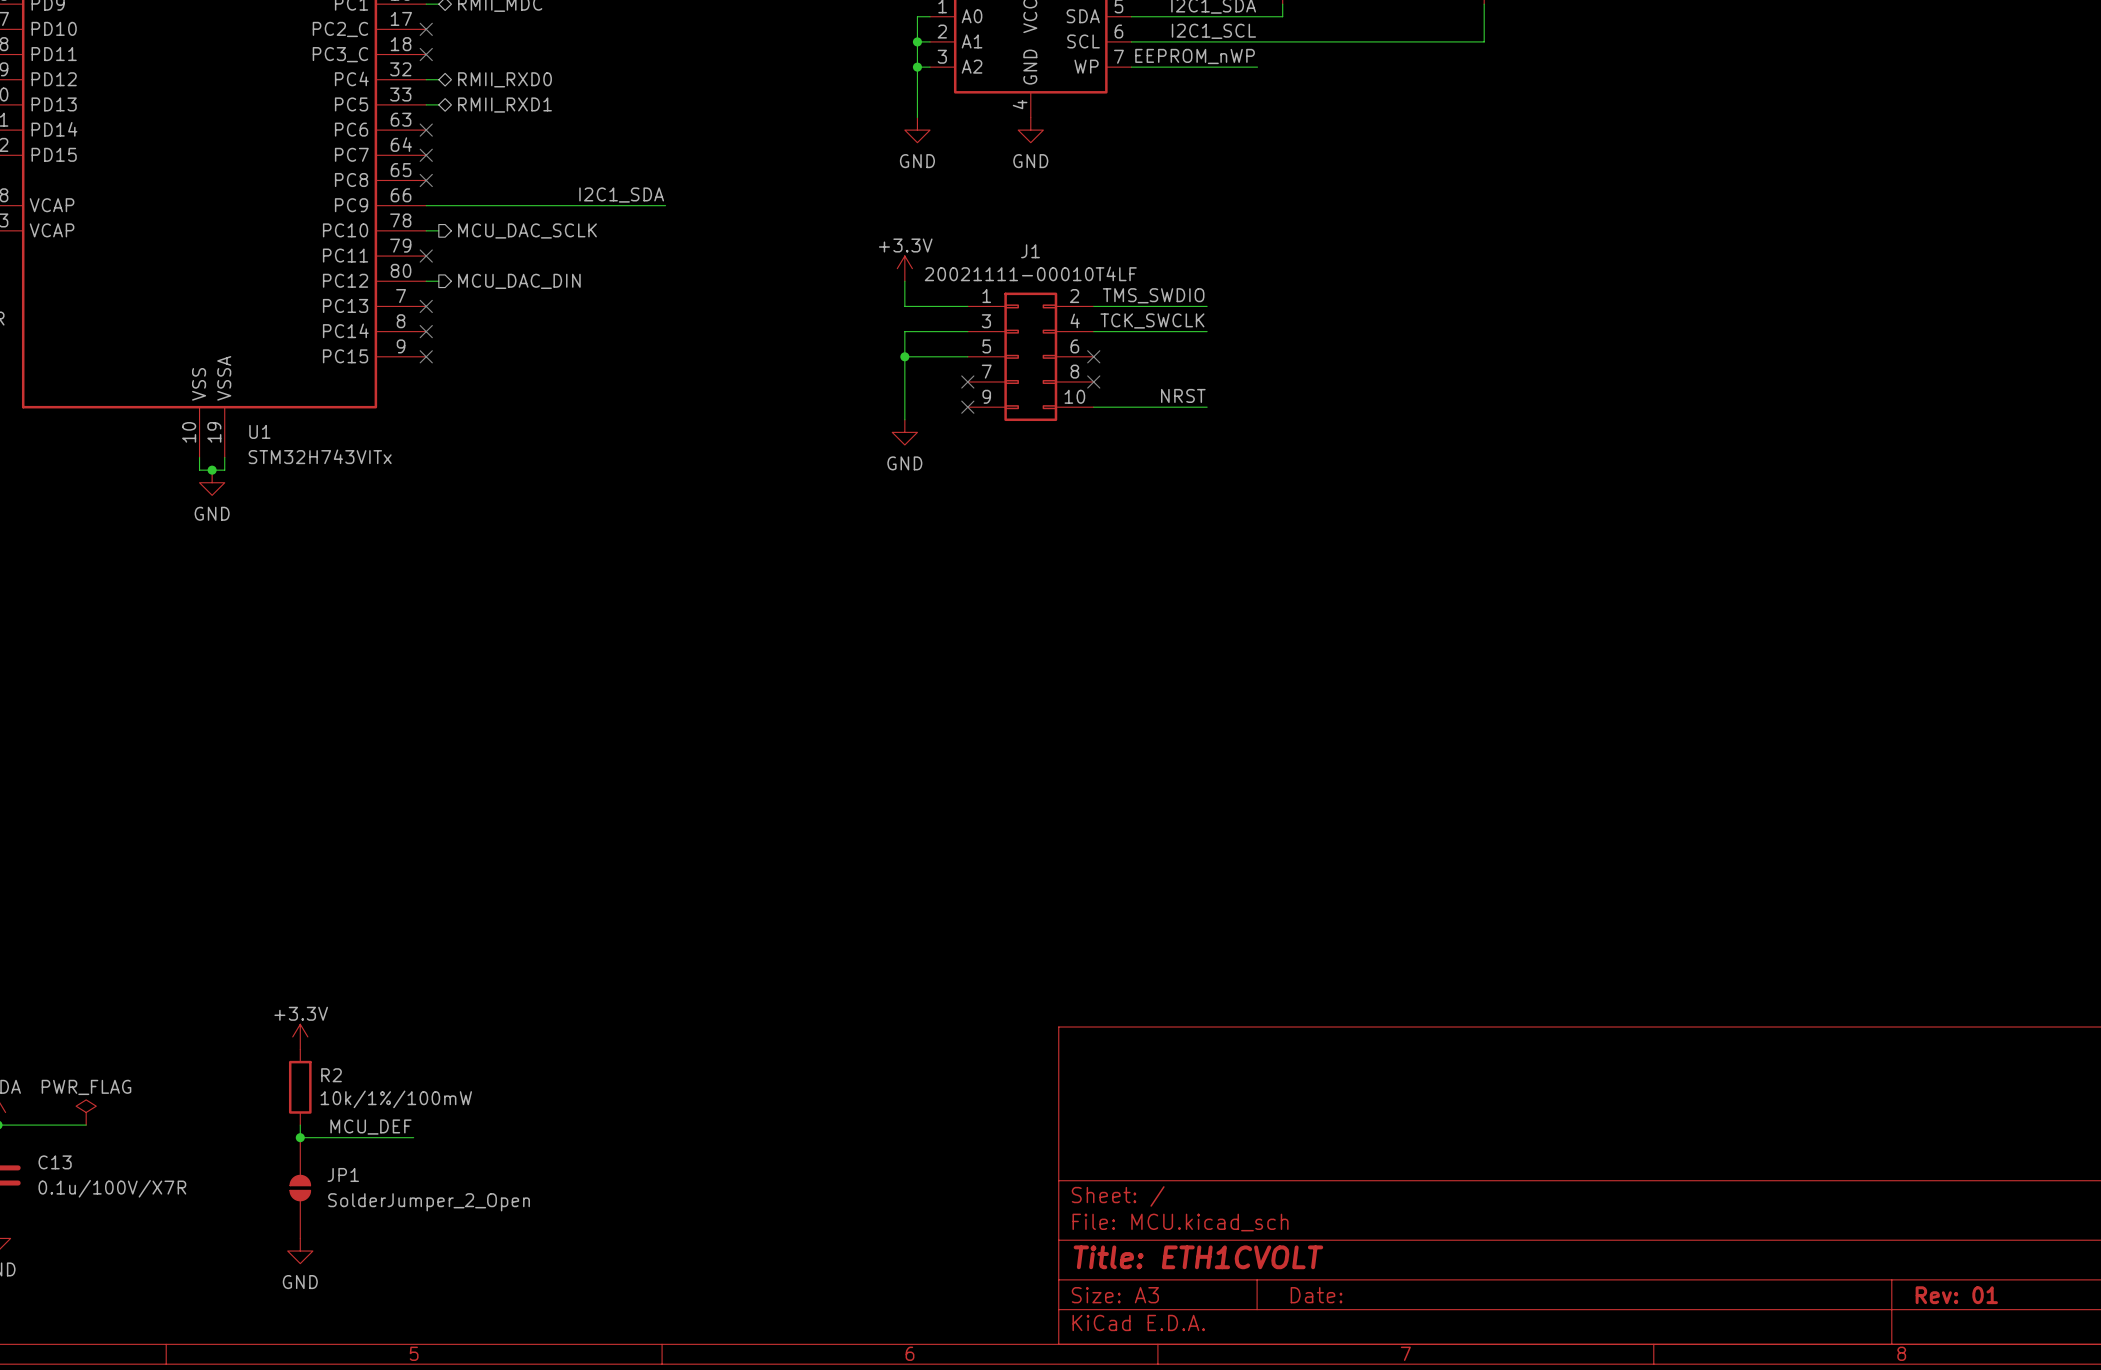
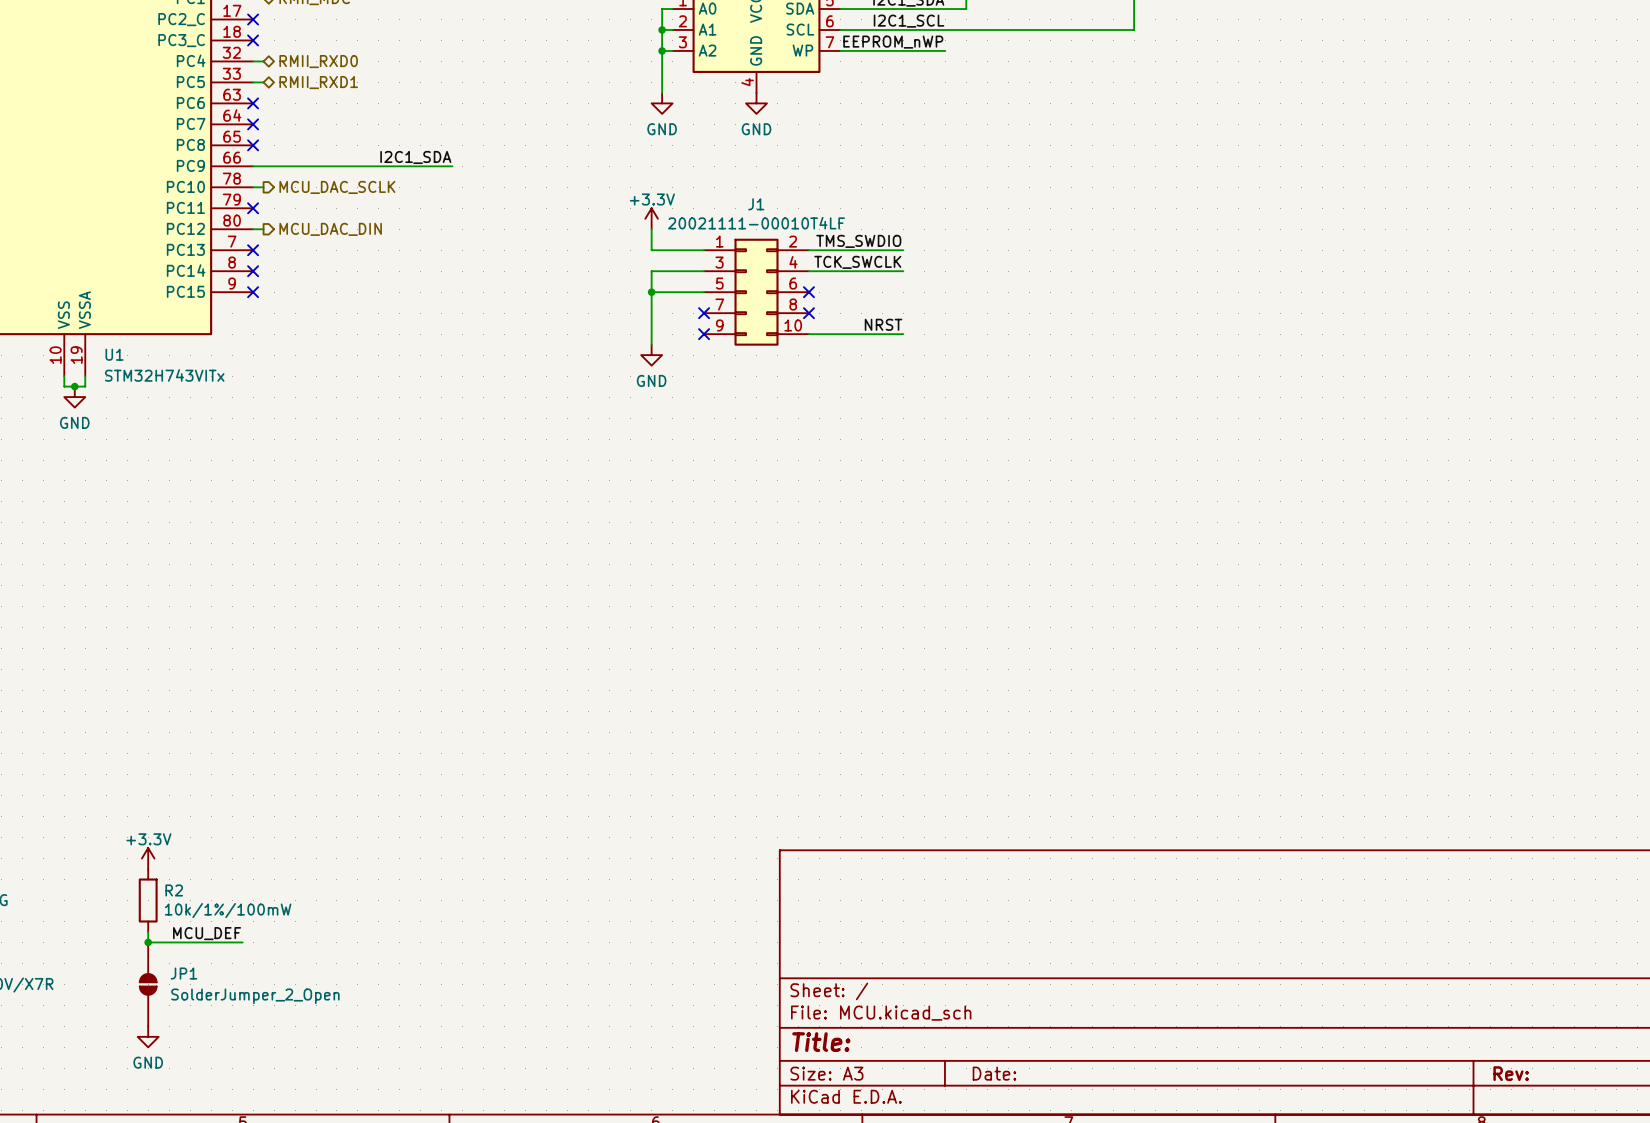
title block: Title: ETH1CVOLT (1198, 1257) -> Title: (821, 1042)
title block: Rev: 01 (1956, 1295) -> Rev: (1511, 1073)

